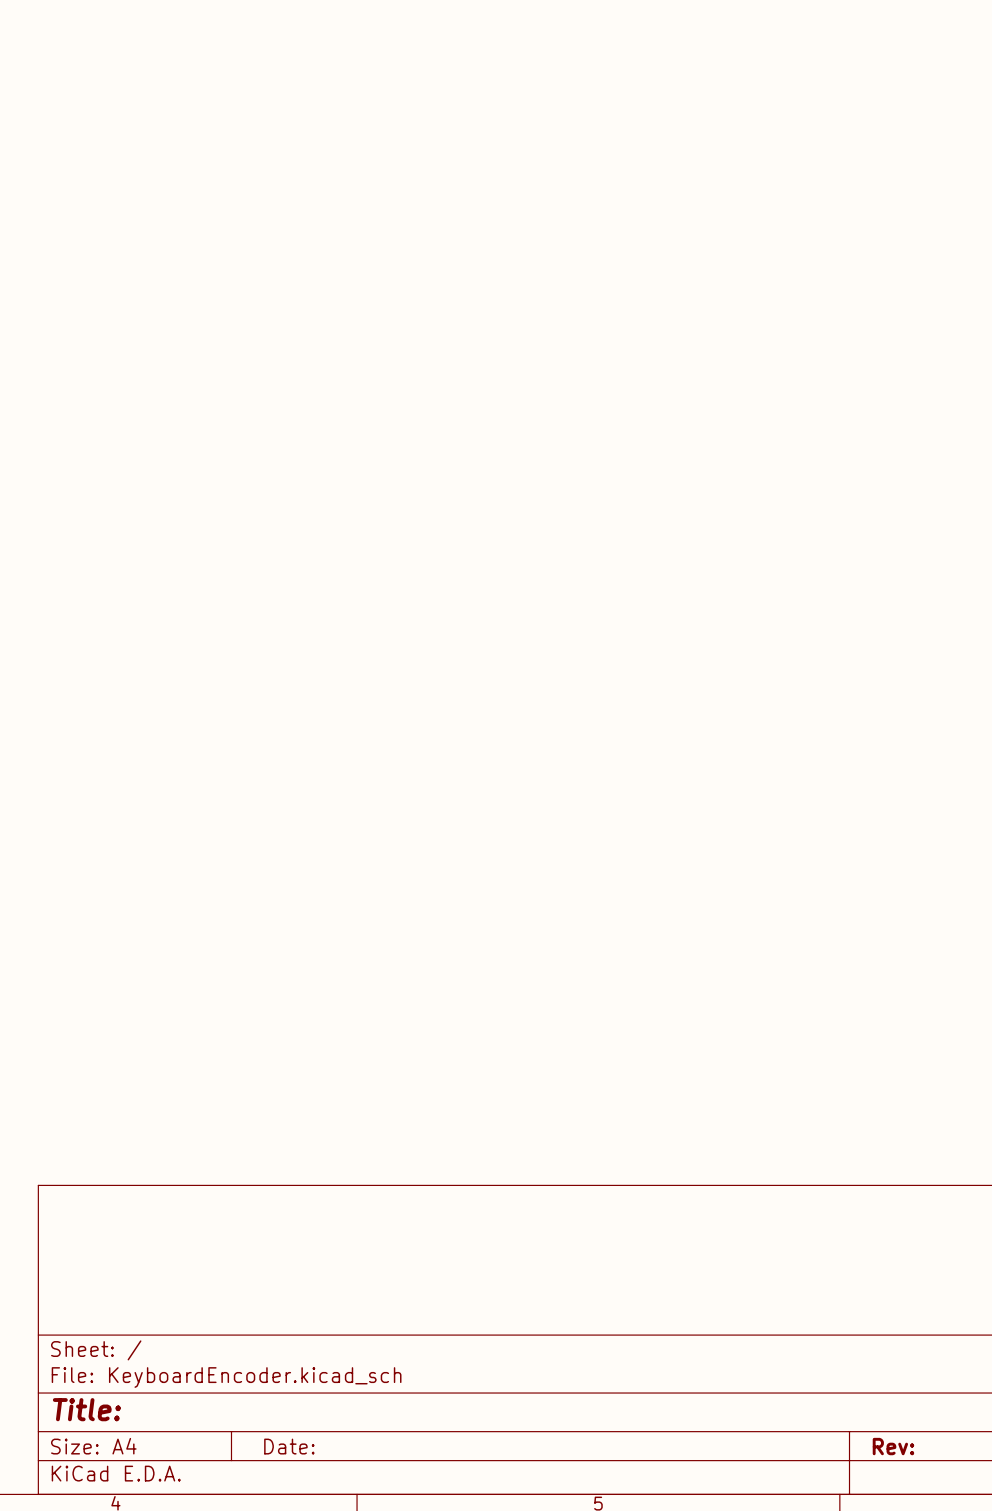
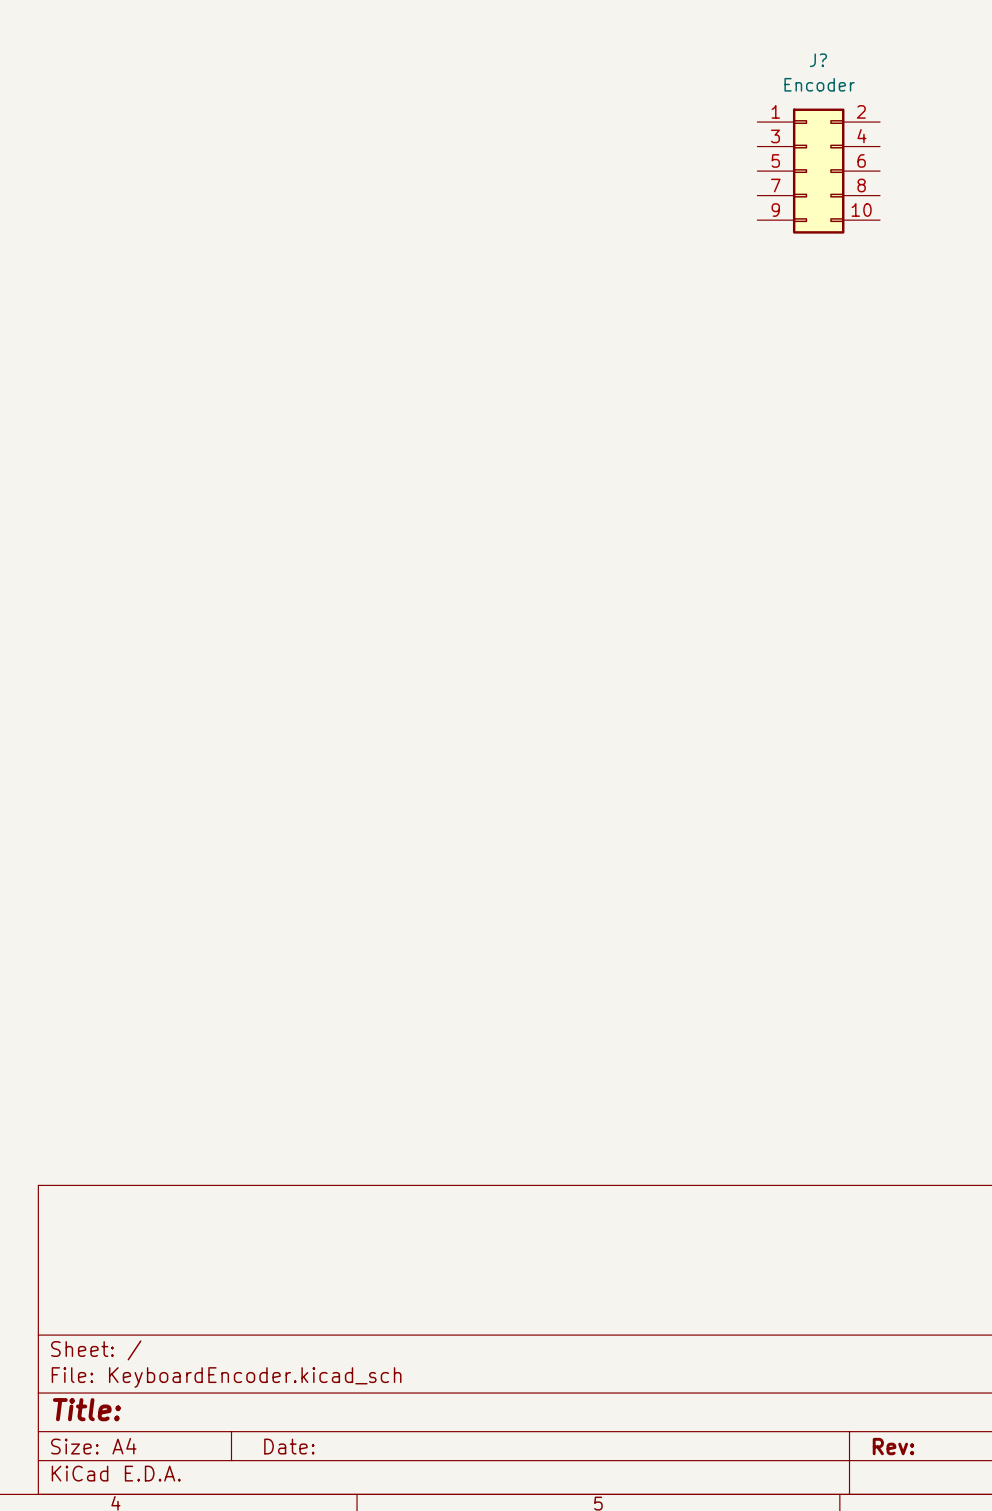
J?: none -> Encoder (818, 171)

